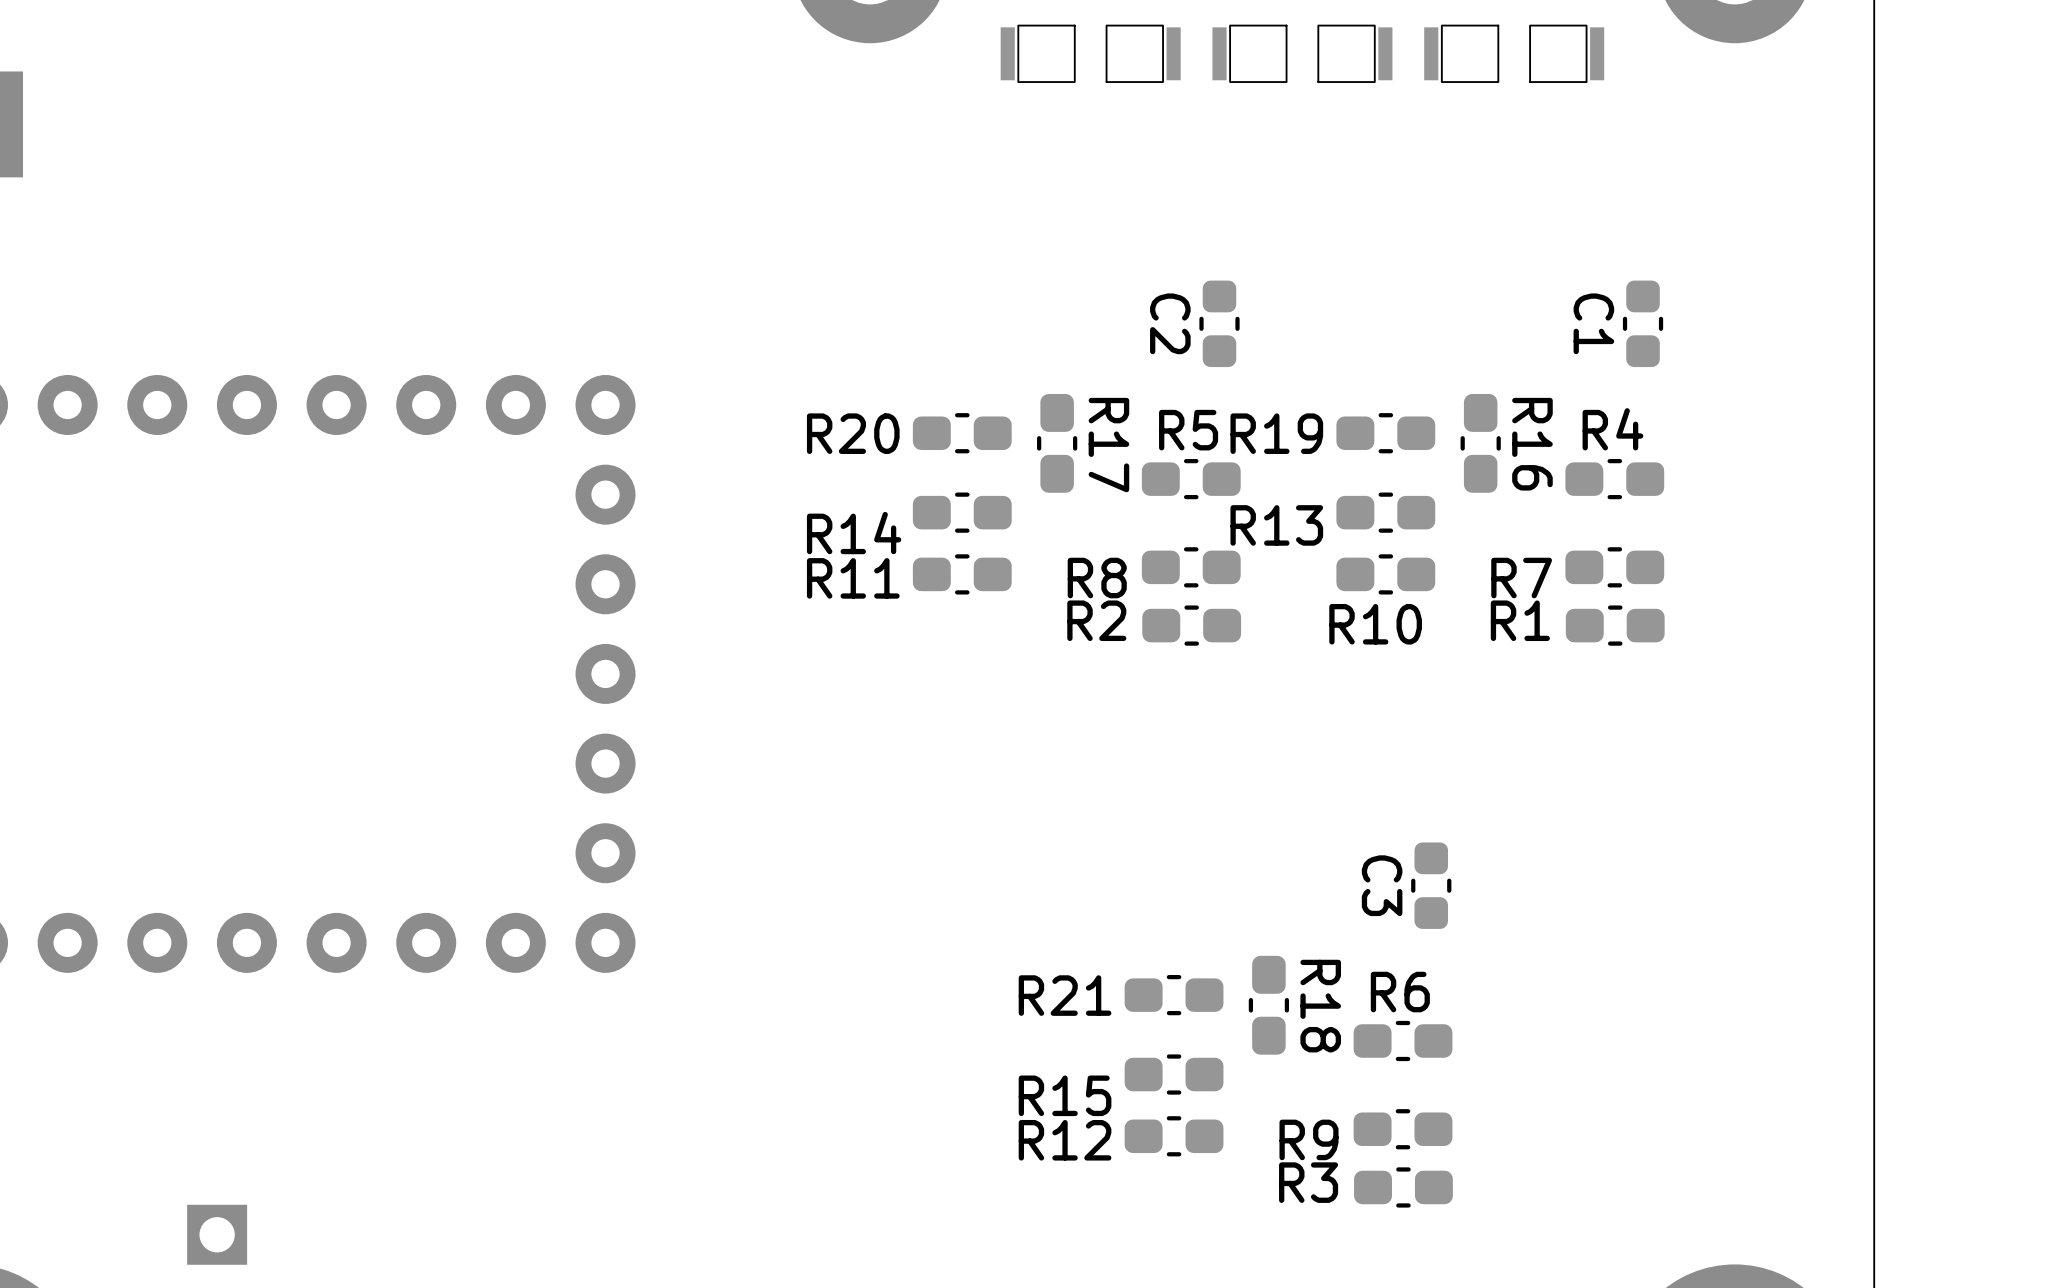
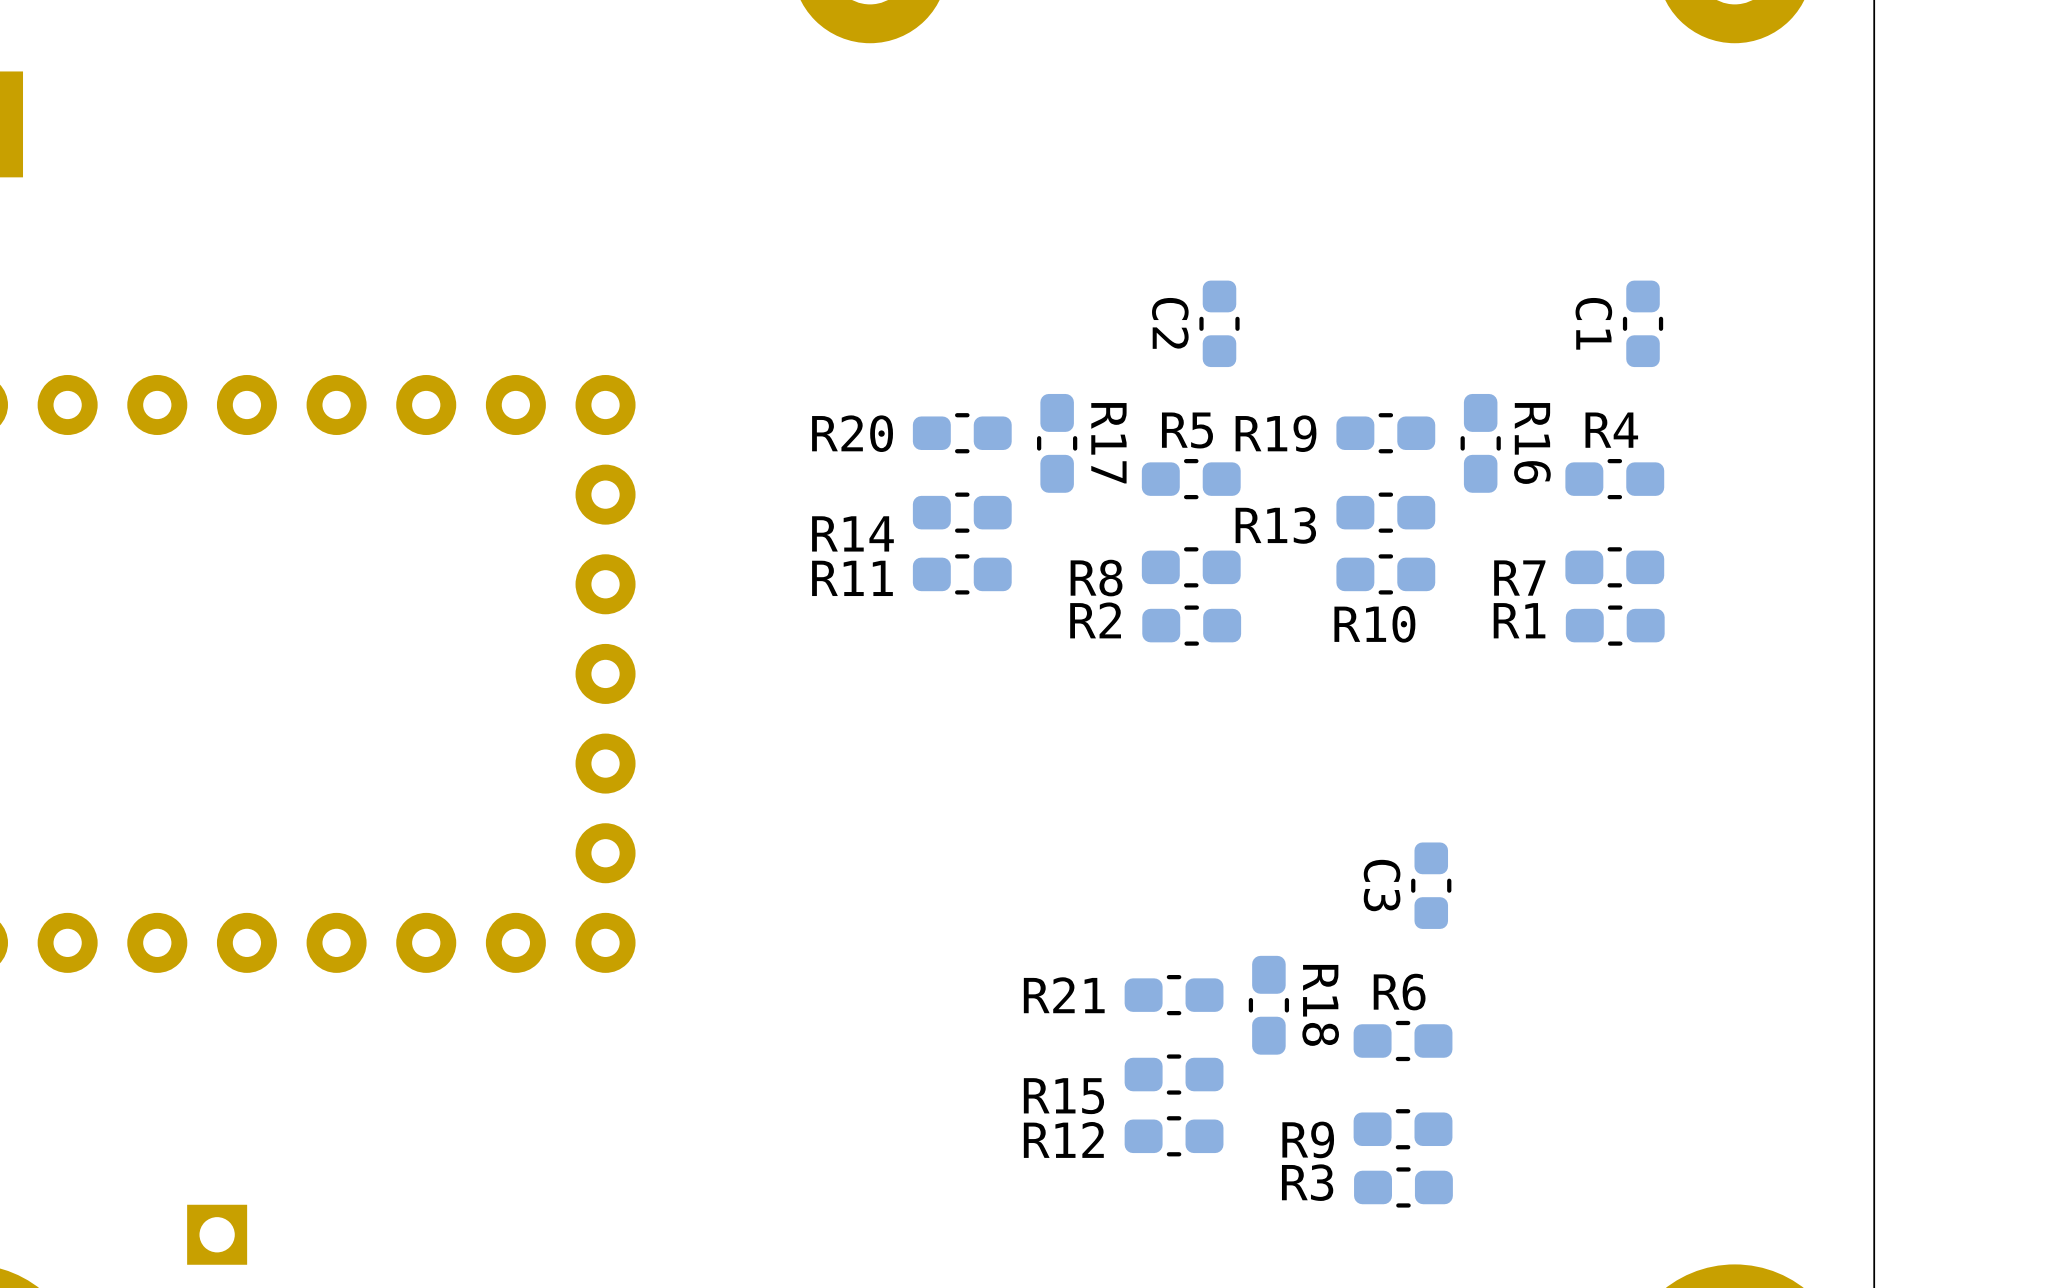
part: (1038, 53) -> none
part: (1143, 53) -> none
part: (1249, 53) -> none
part: (1354, 53) -> none
part: (1461, 53) -> none
part: (1566, 53) -> none

